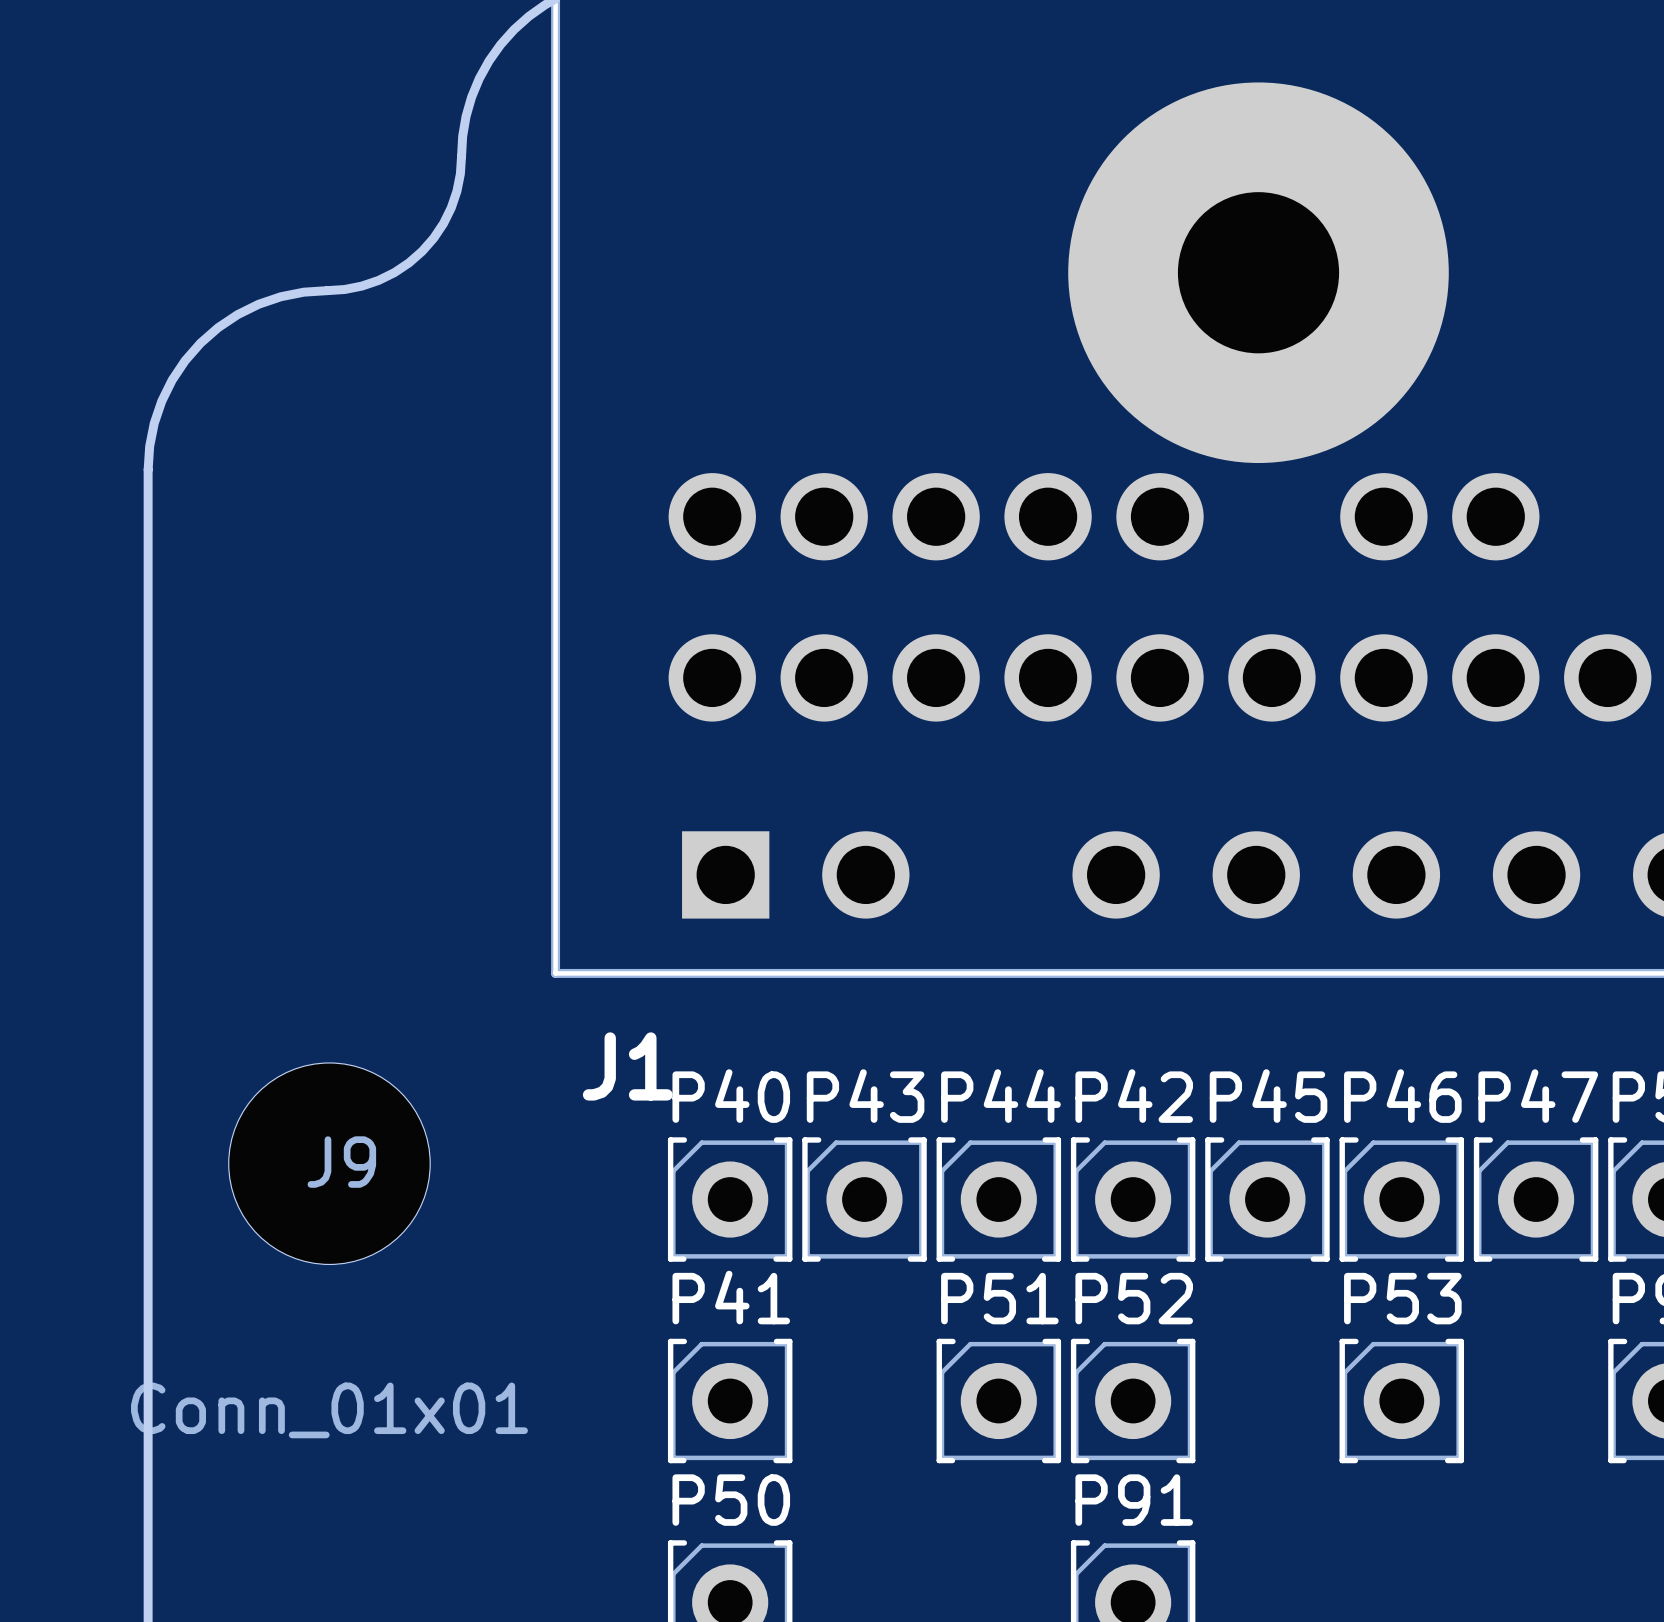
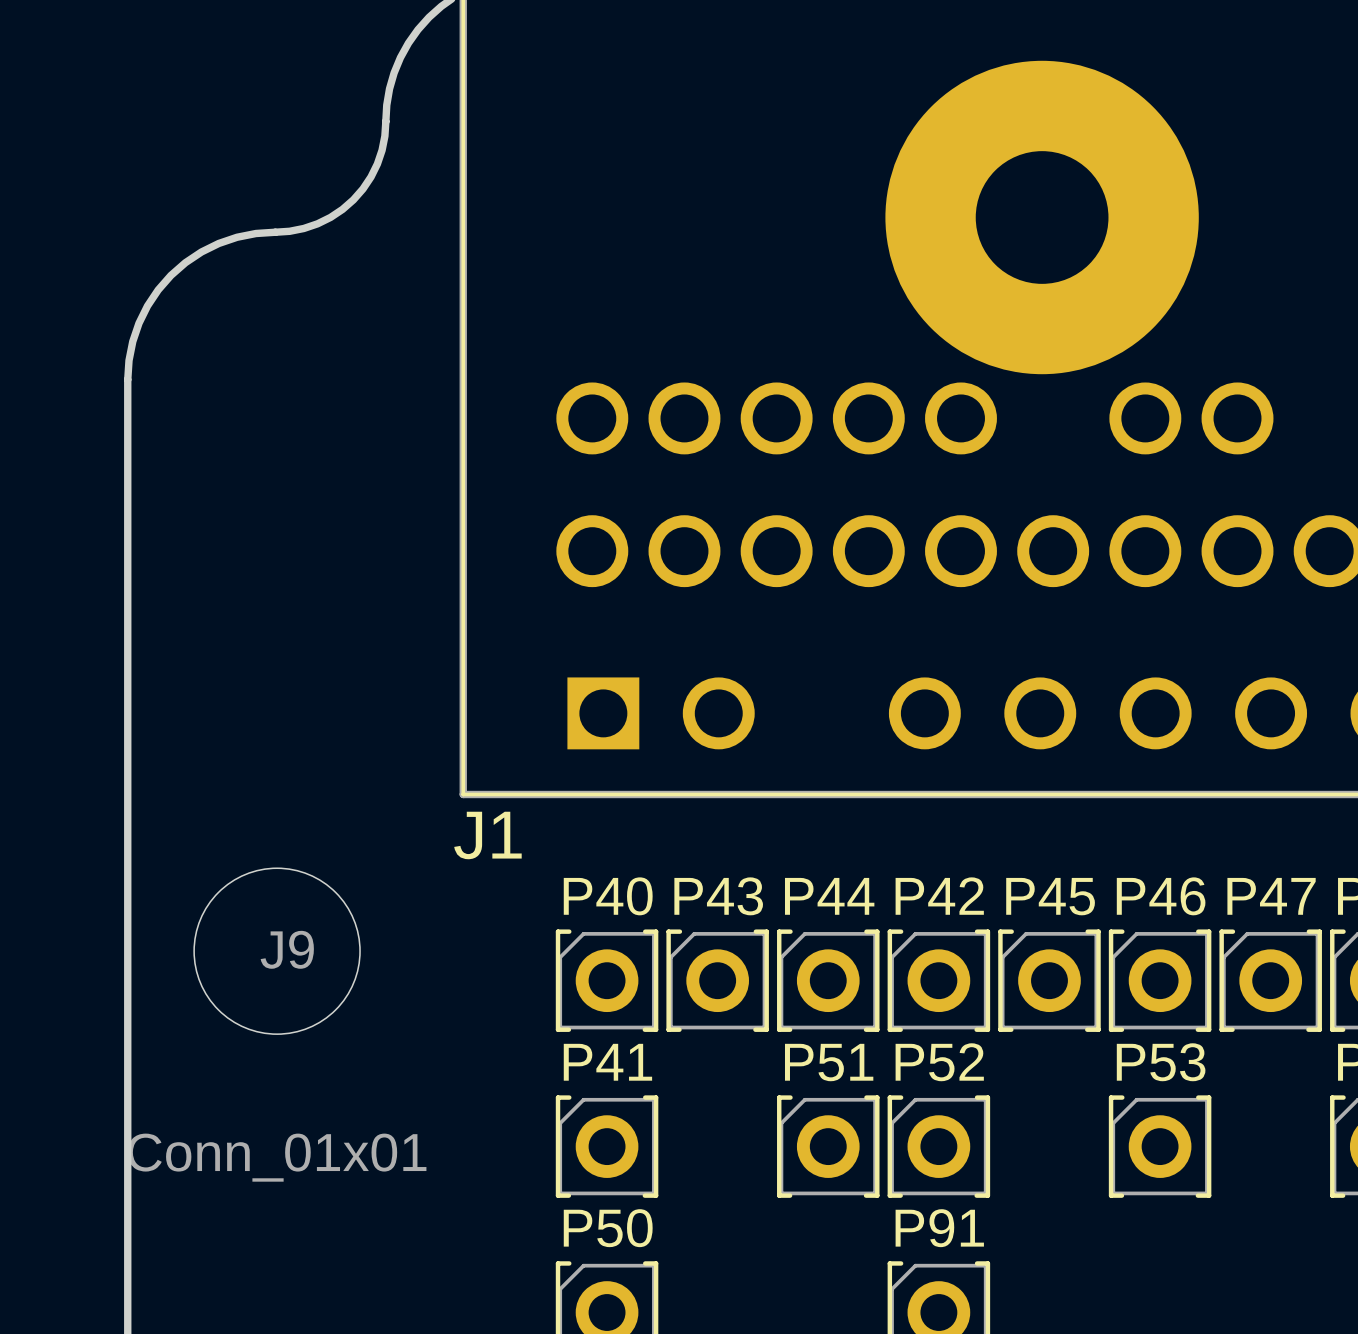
J1 name position: J1 (627, 1066) -> J1 (487, 835)

